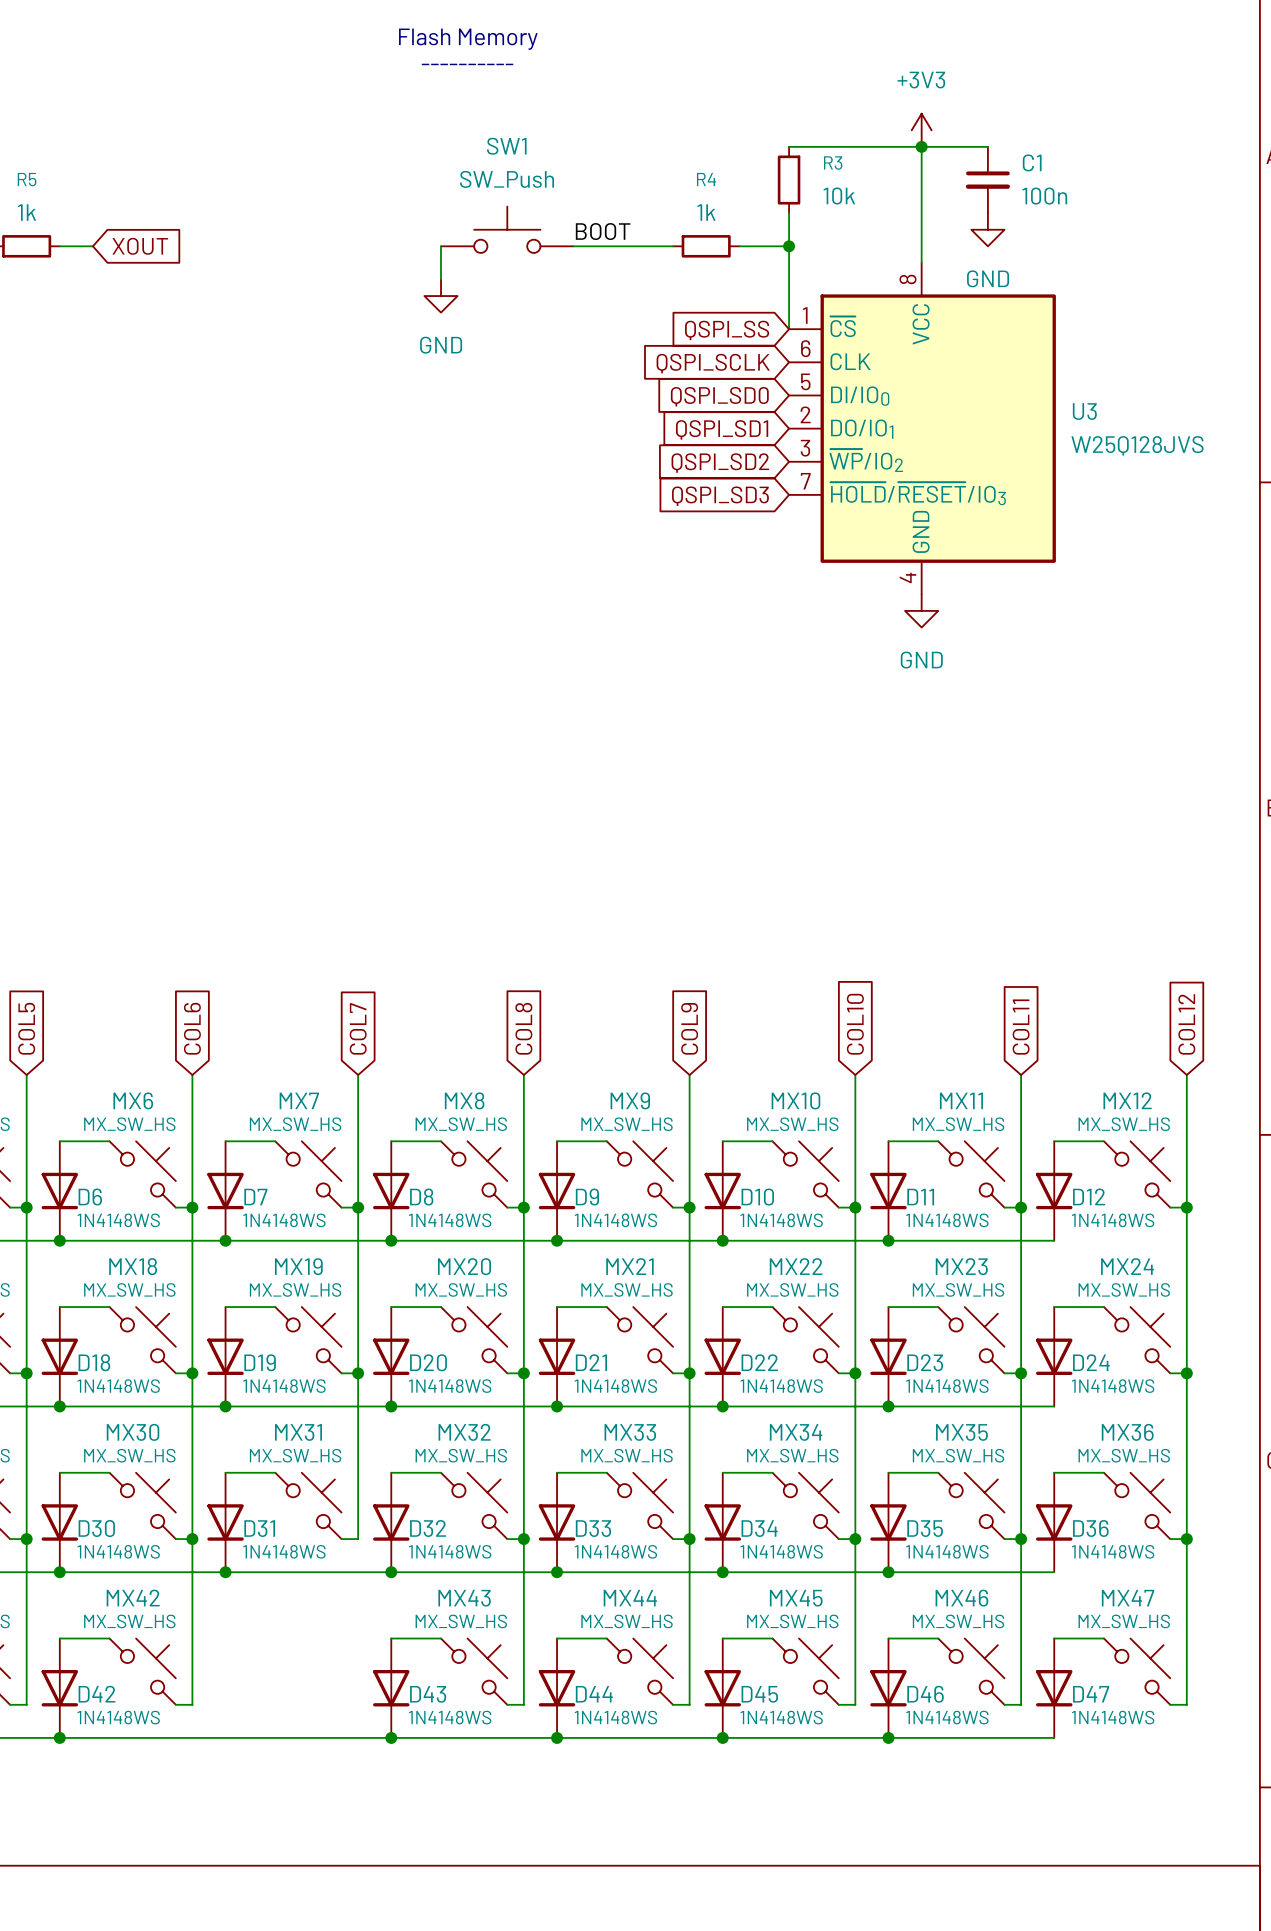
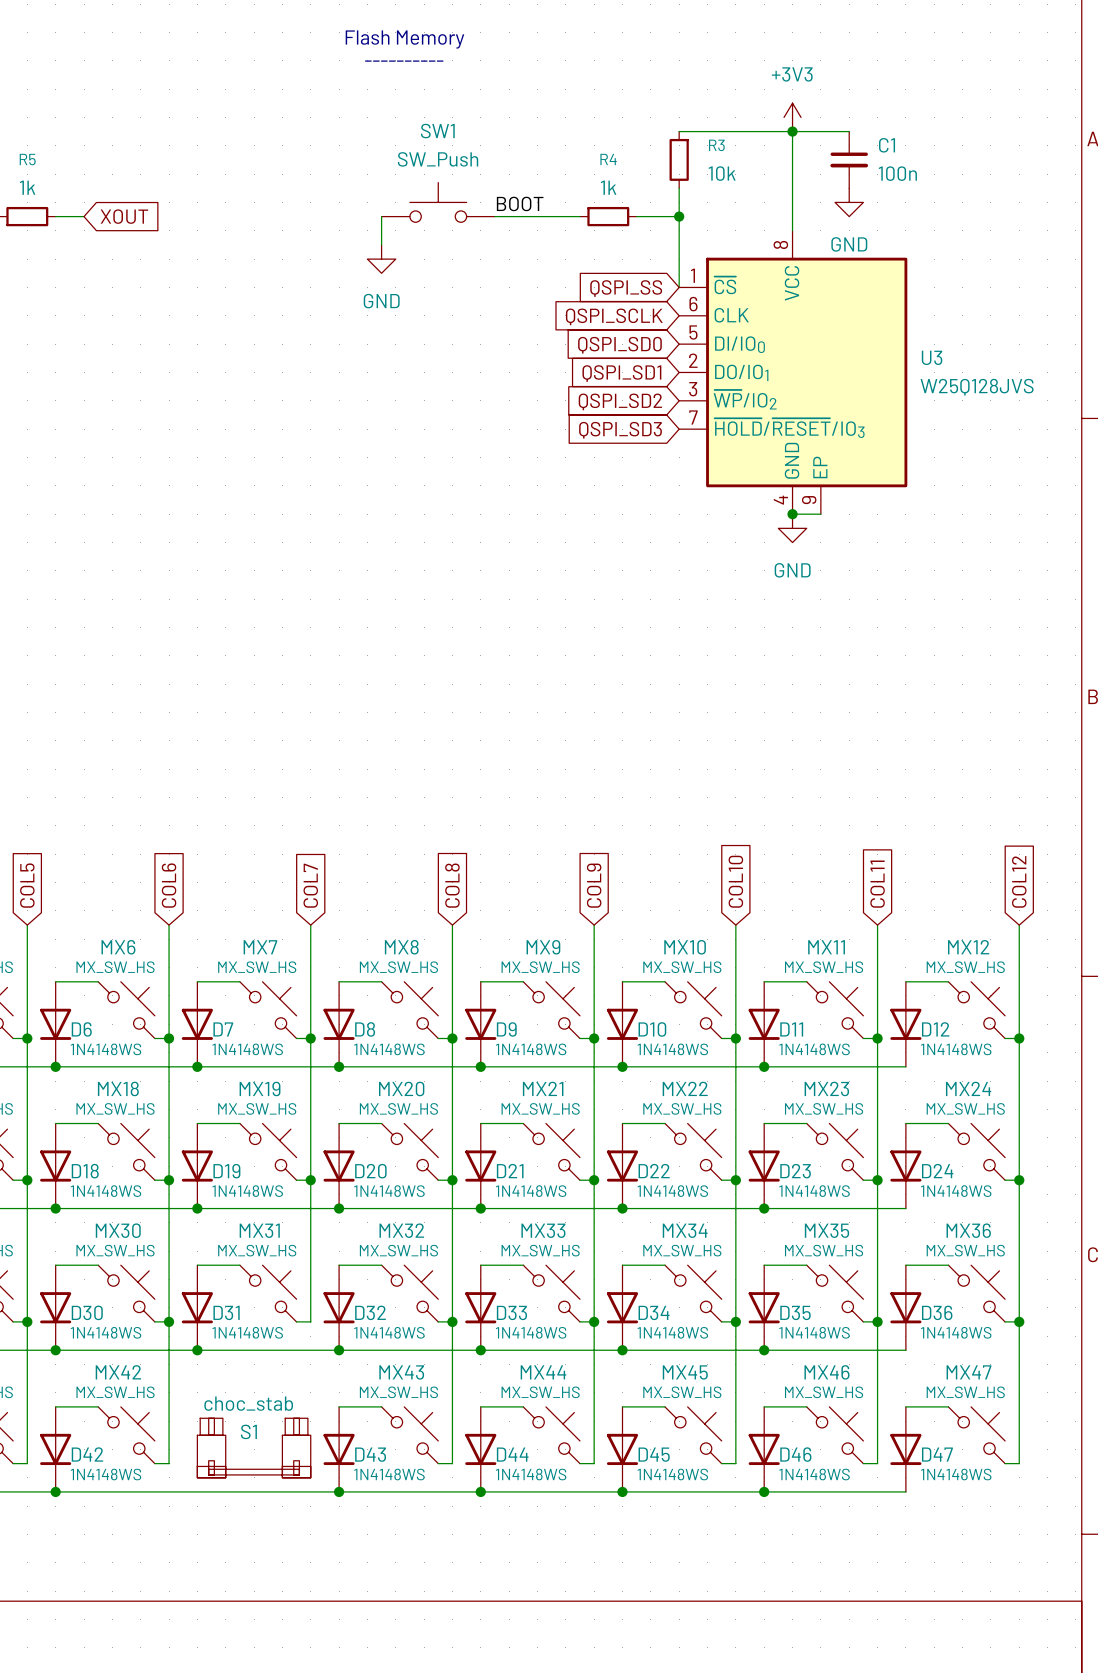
U3 symbol: [789, 262, 1056, 595] -> [679, 230, 908, 515]
wire: none -> (792, 514) (820, 514)
junction: none -> (792, 514)
S1: none -> choc_stab (254, 1448)

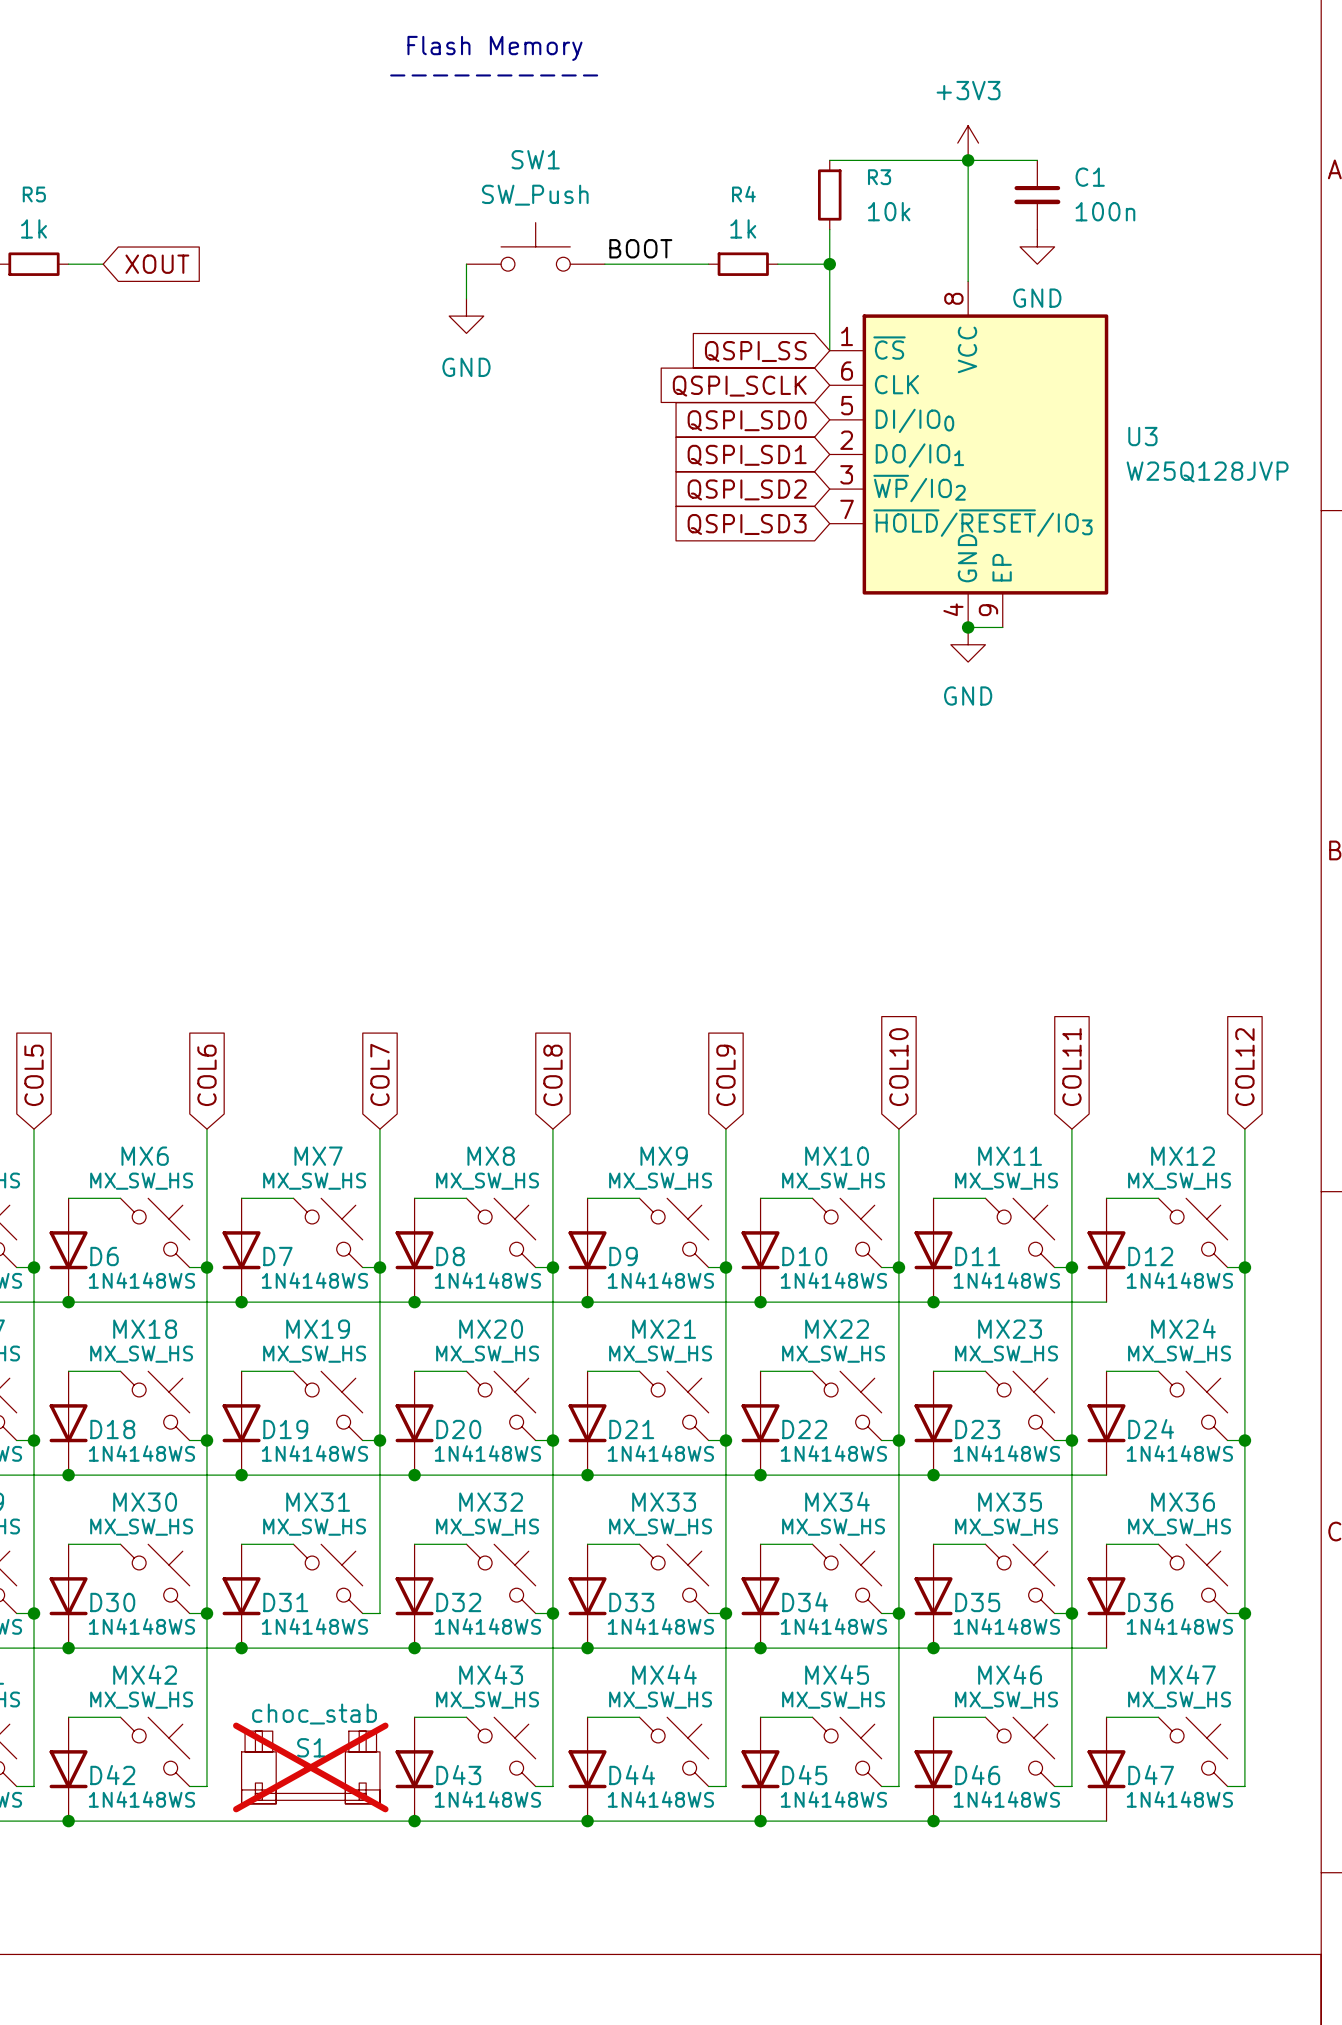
U3 value: W25Q128JVS (977, 387) -> W25Q128JVP (1207, 471)
S1 do-not-place cross: none -> (310, 1767)

